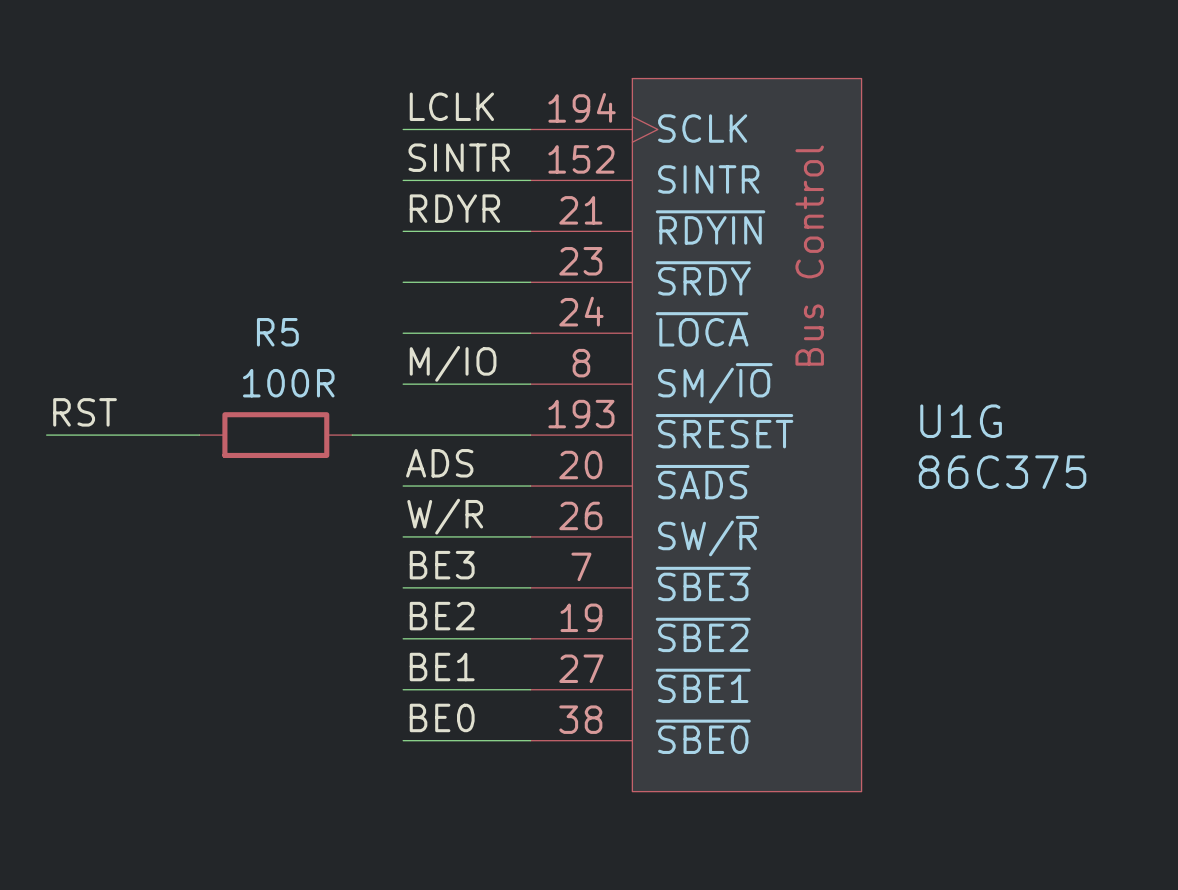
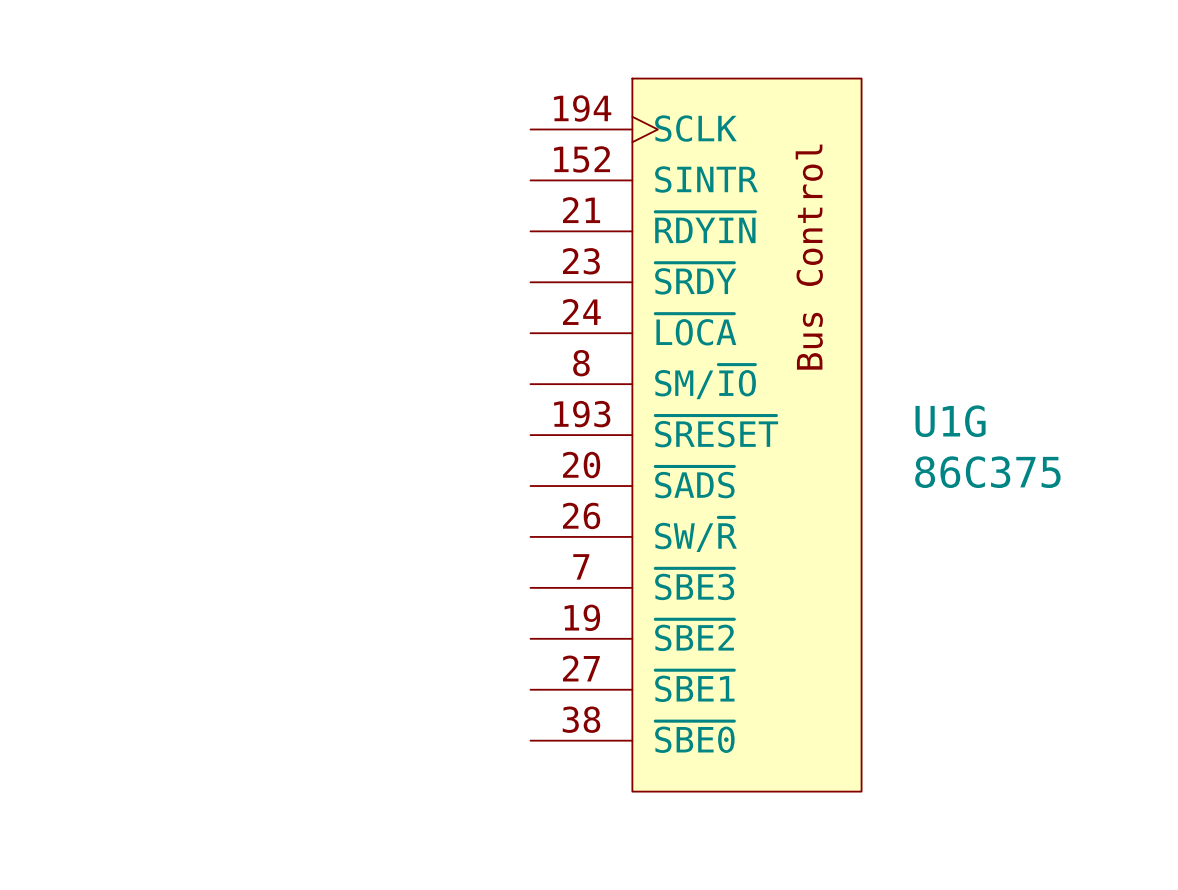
label: LCLK (451, 106) -> none
wire: (403, 129) (530, 129) -> none
label: SINTR (459, 157) -> none
wire: (403, 180) (530, 180) -> none
label: RDYR (454, 208) -> none
wire: (403, 231) (530, 231) -> none
wire: (403, 282) (530, 282) -> none
wire: (403, 333) (530, 333) -> none
label: M/IO (453, 363) -> none
wire: (403, 384) (530, 384) -> none
label: RST (85, 412) -> none
wire: (46, 435) (199, 435) -> none
R5: 100R (275, 435) -> none
wire: (352, 435) (530, 435) -> none
label: ADS (439, 463) -> none
wire: (403, 486) (530, 486) -> none
label: W/R (445, 516) -> none
wire: (403, 536) (530, 536) -> none
label: BE3 (442, 565) -> none
wire: (403, 587) (530, 587) -> none
label: BE2 (442, 616) -> none
wire: (403, 638) (530, 638) -> none
label: BE1 (442, 667) -> none
wire: (403, 689) (530, 689) -> none
label: BE0 (442, 717) -> none
wire: (403, 740) (530, 740) -> none

